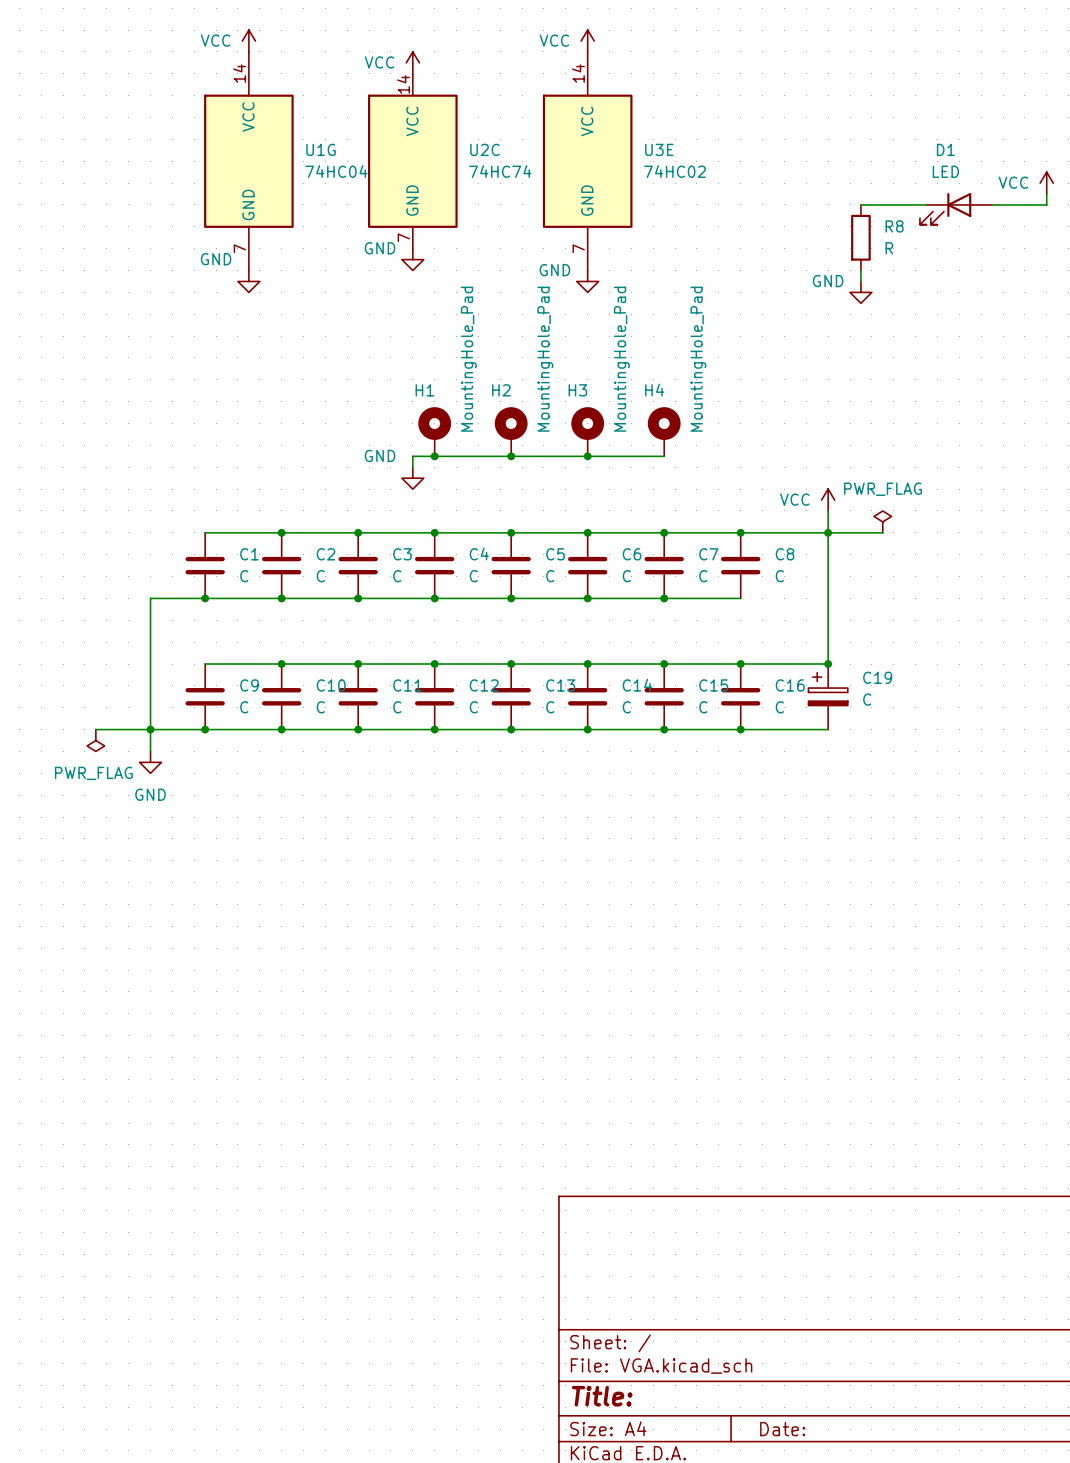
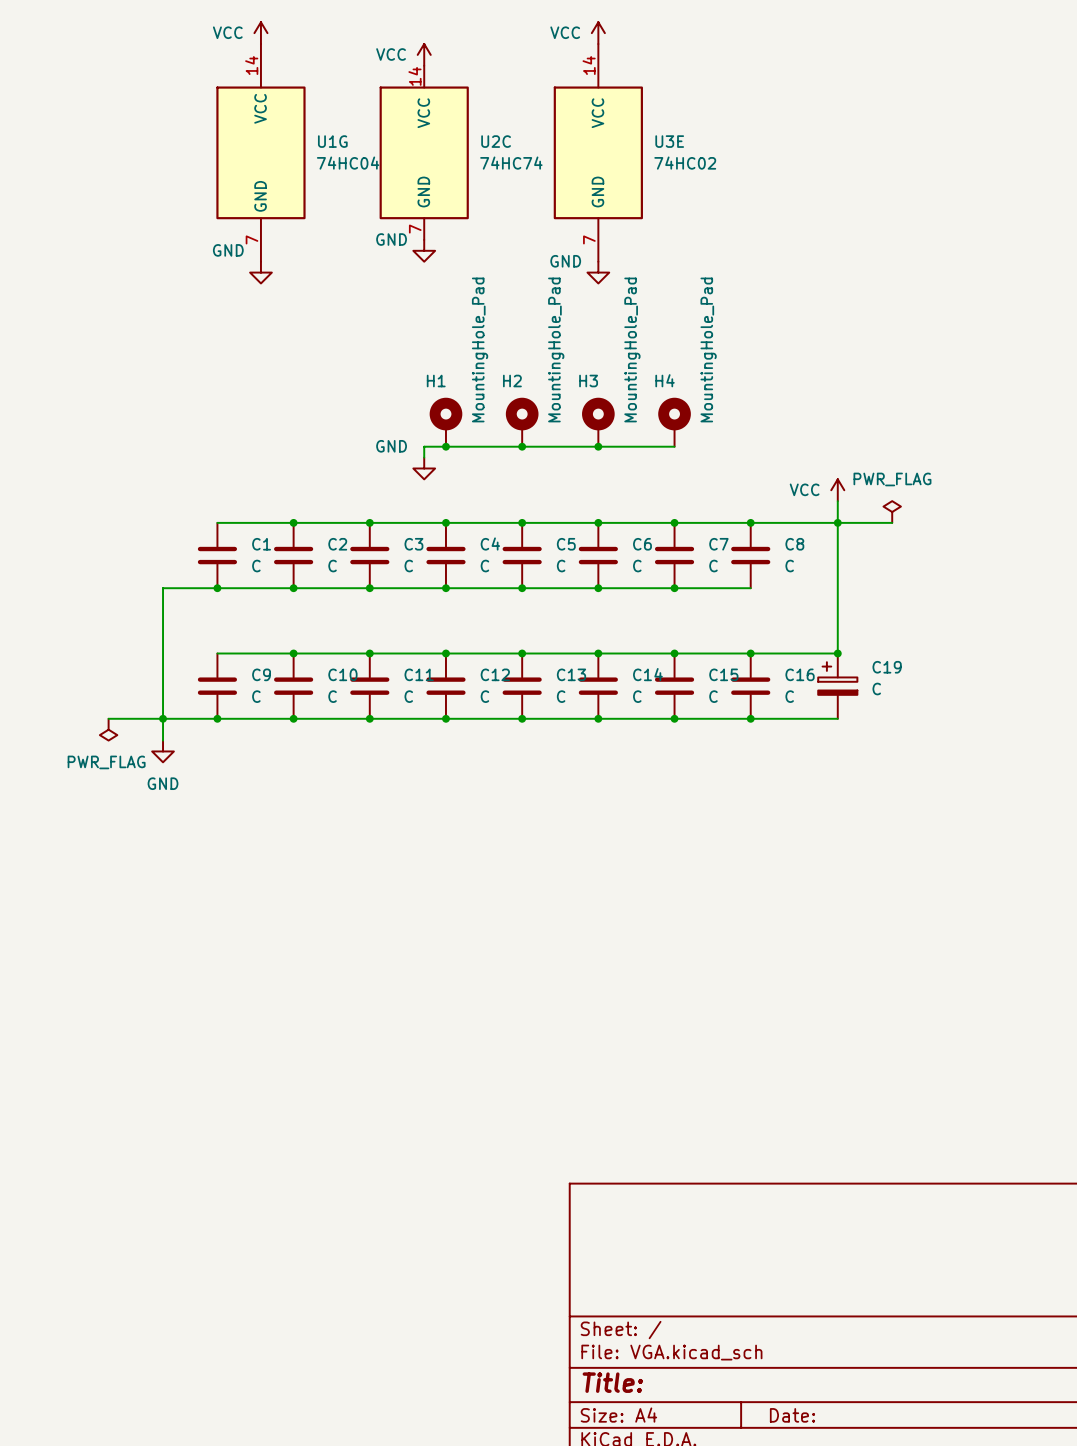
power symbol: VCC (1046, 183) -> none
wire: (1046, 194) (1046, 204) (992, 204) -> none
wire: (860, 204) (926, 204) -> none
D1: LED (956, 208) -> none
R8: R (860, 237) -> none
wire: (860, 270) (860, 281) -> none
power symbol: GND (860, 292) -> none

